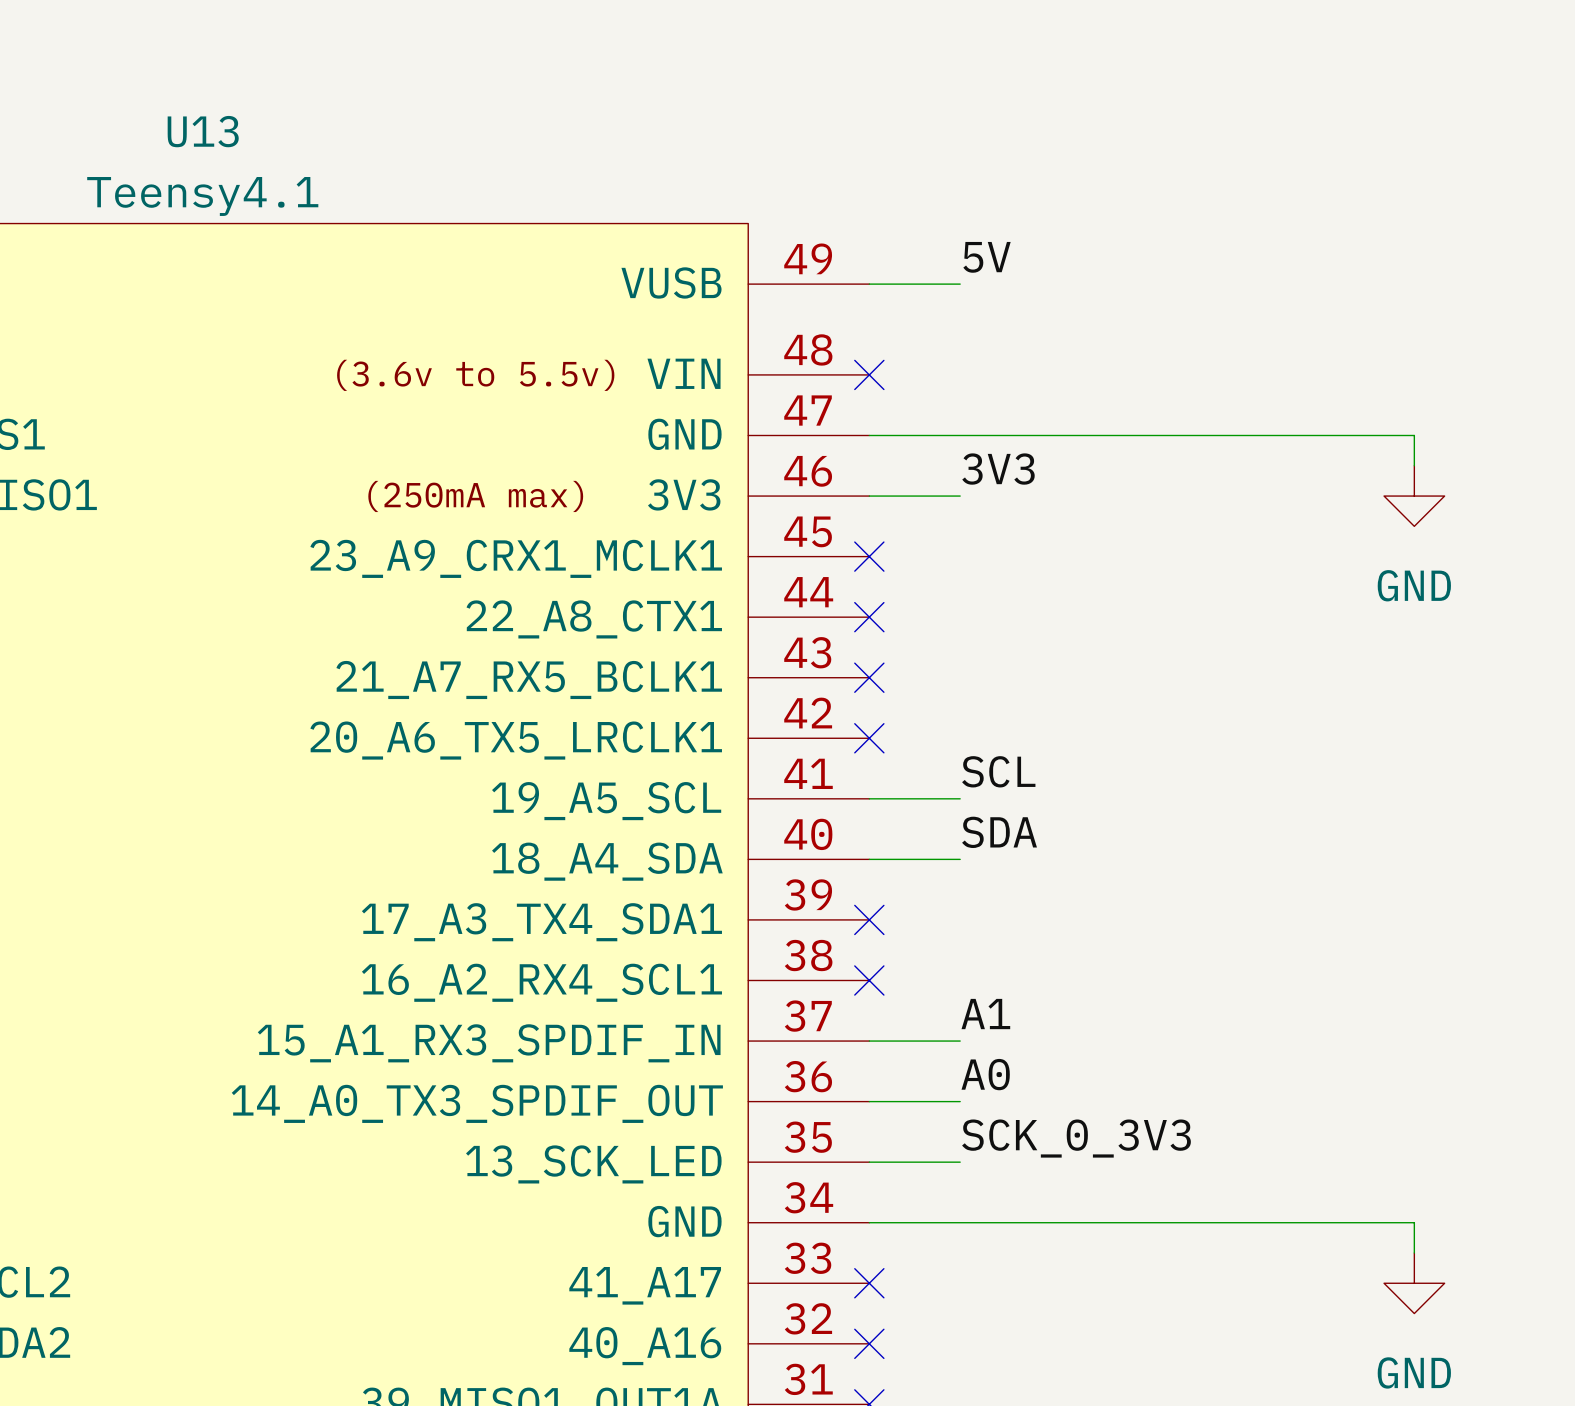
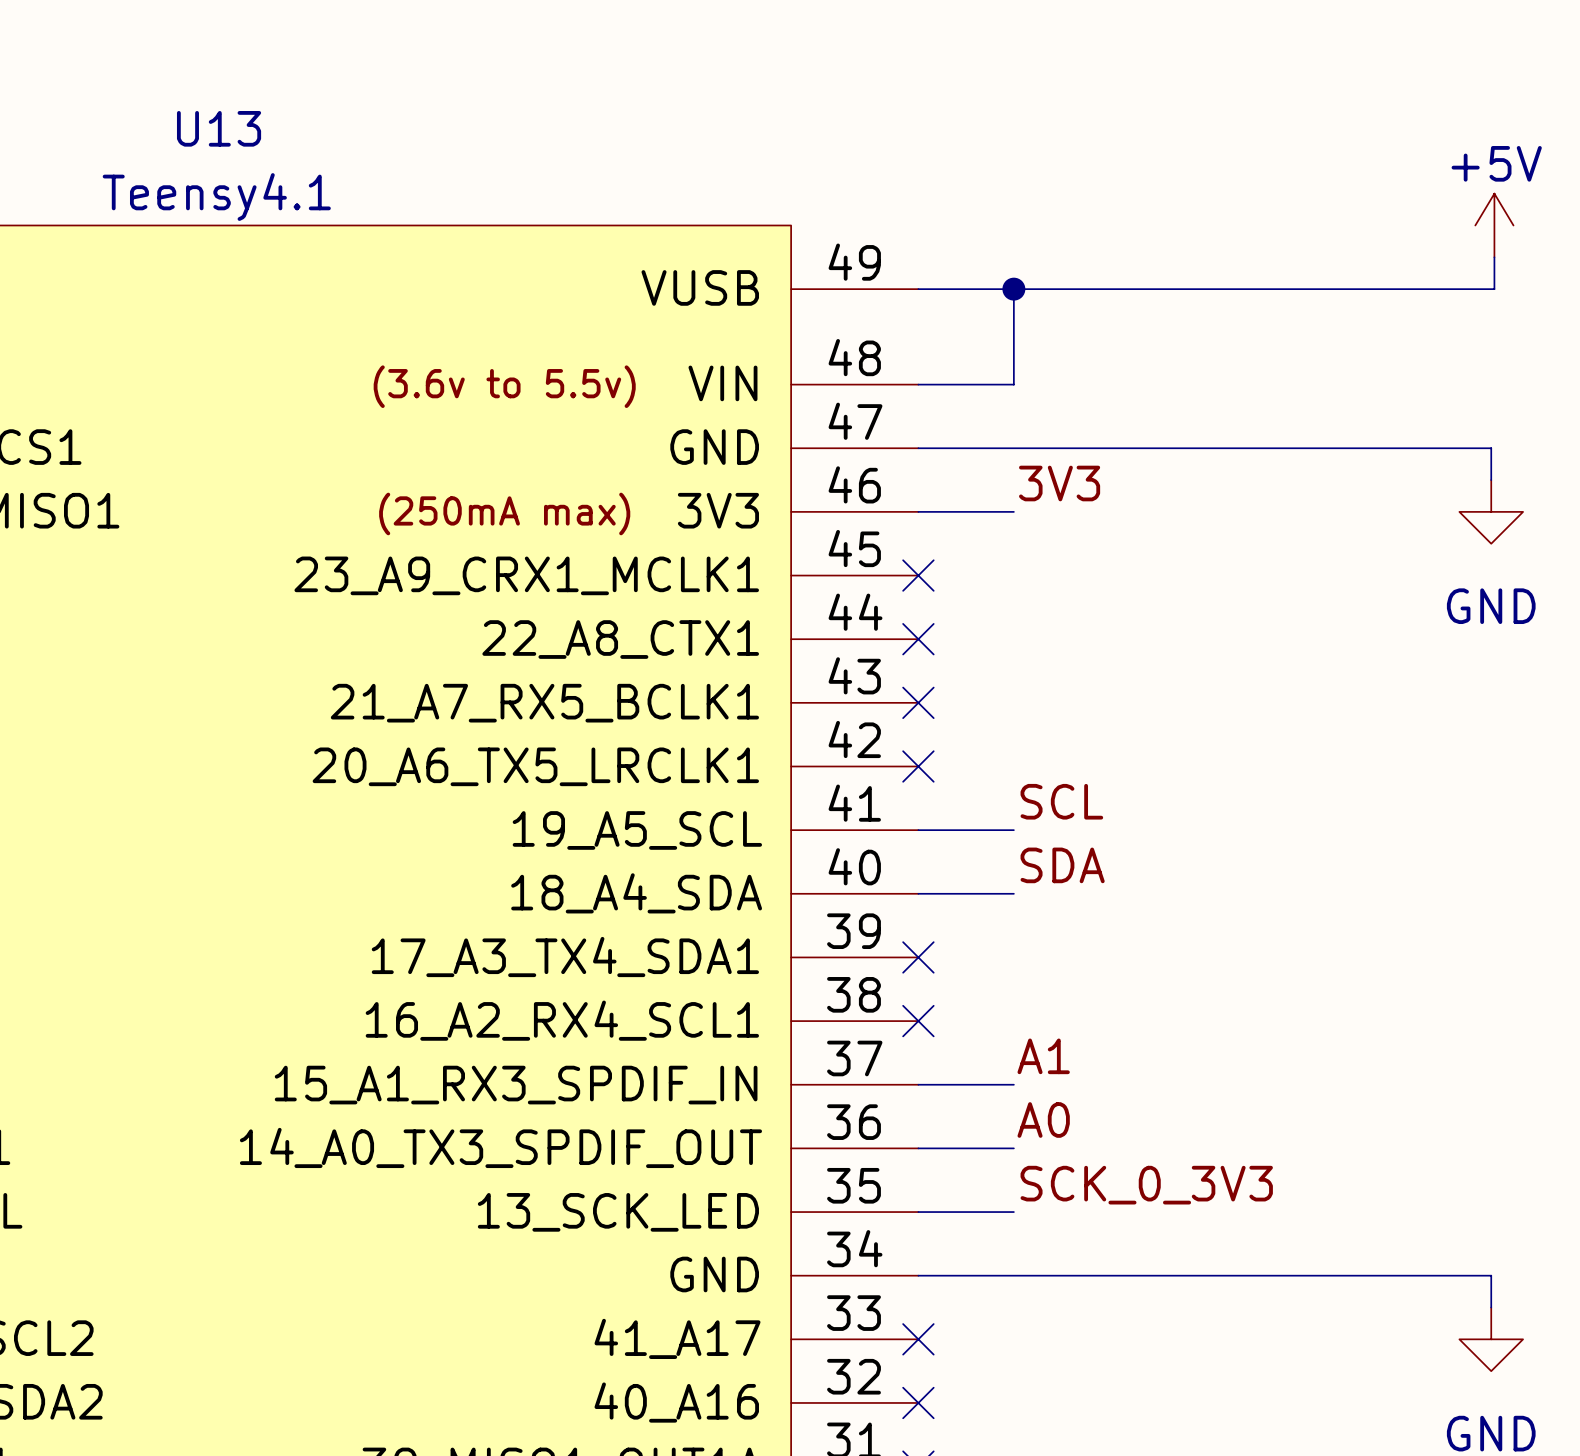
power symbol: none -> +5V (1494, 225)
wire: none -> (1494, 257) (1494, 289) (1013, 289) (1013, 384) (918, 384)
label: 5V (987, 257) -> none
junction: none -> (1013, 289)
no-connect mark: (869, 374) -> none

